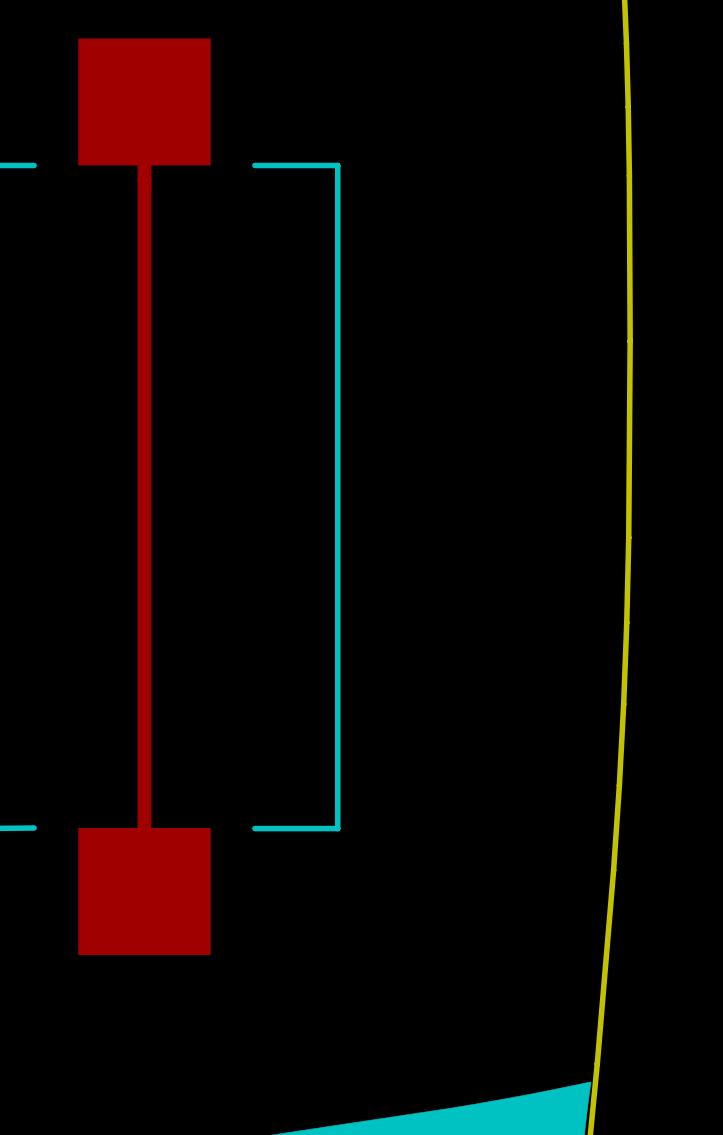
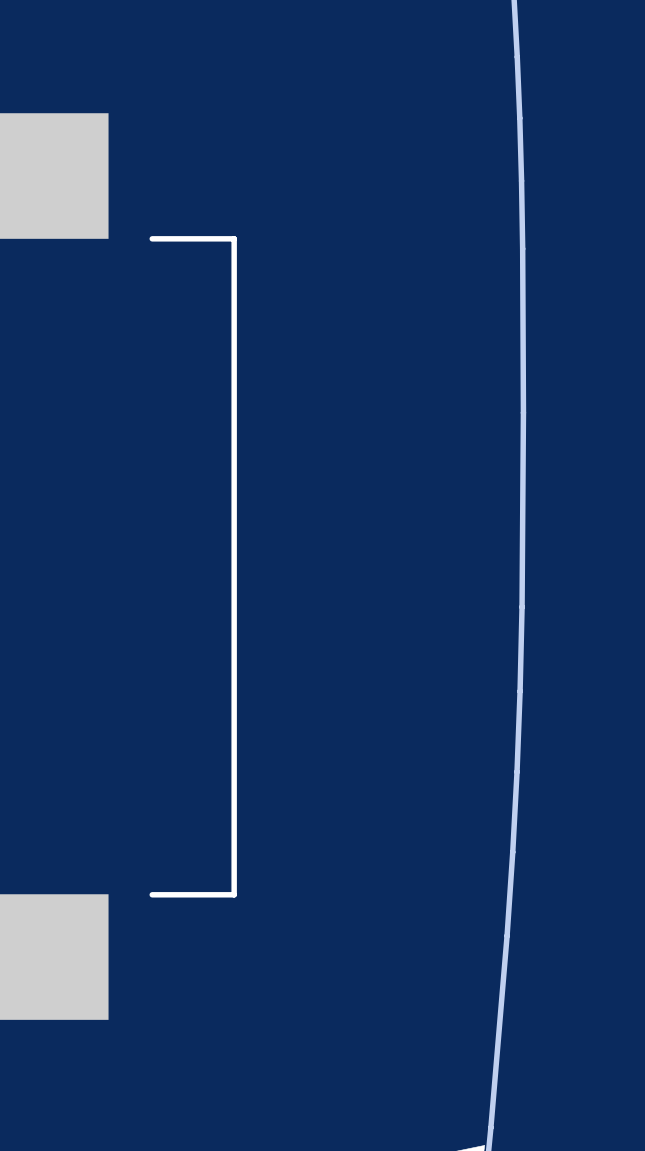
track: (144, 102) (144, 891) -> none

